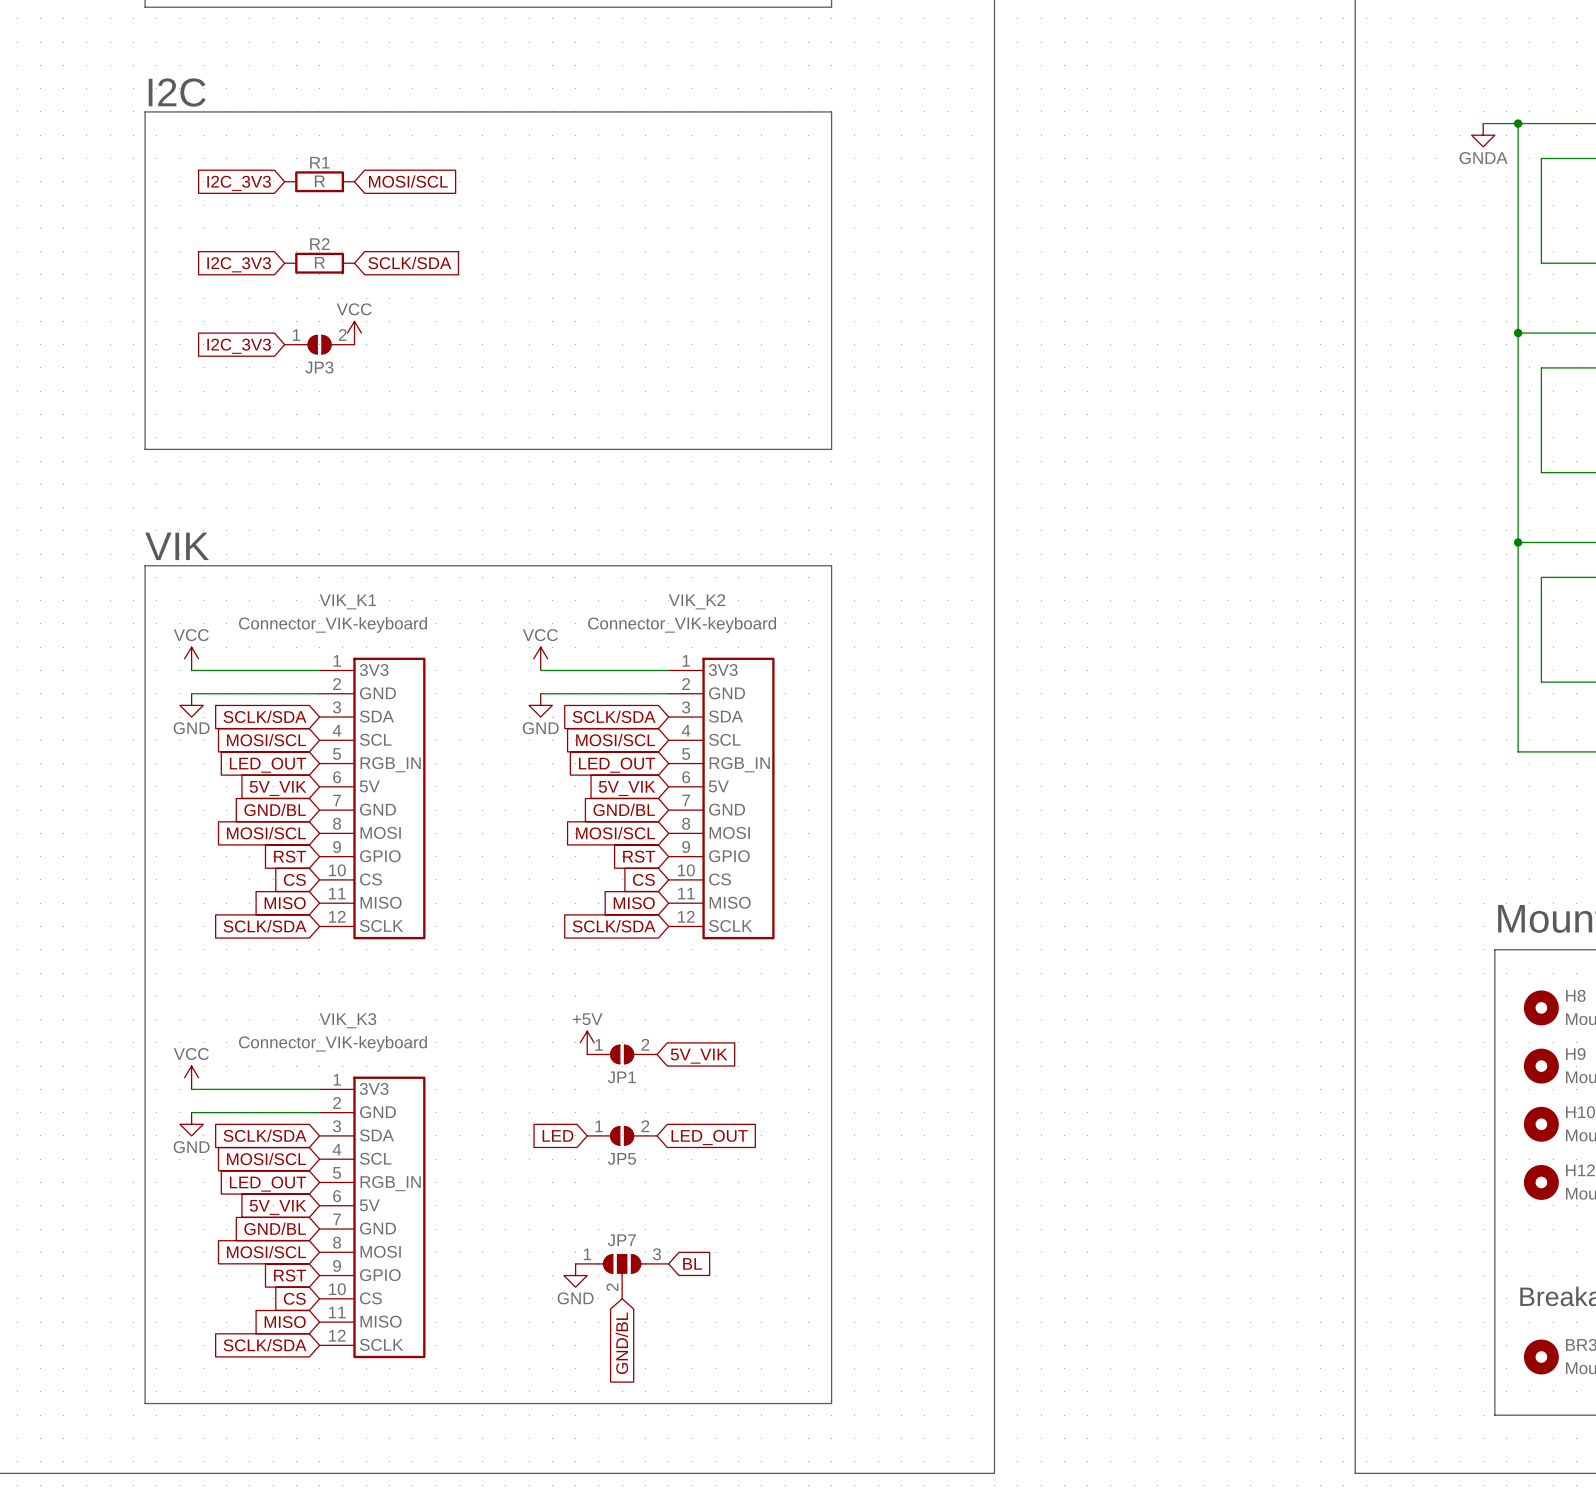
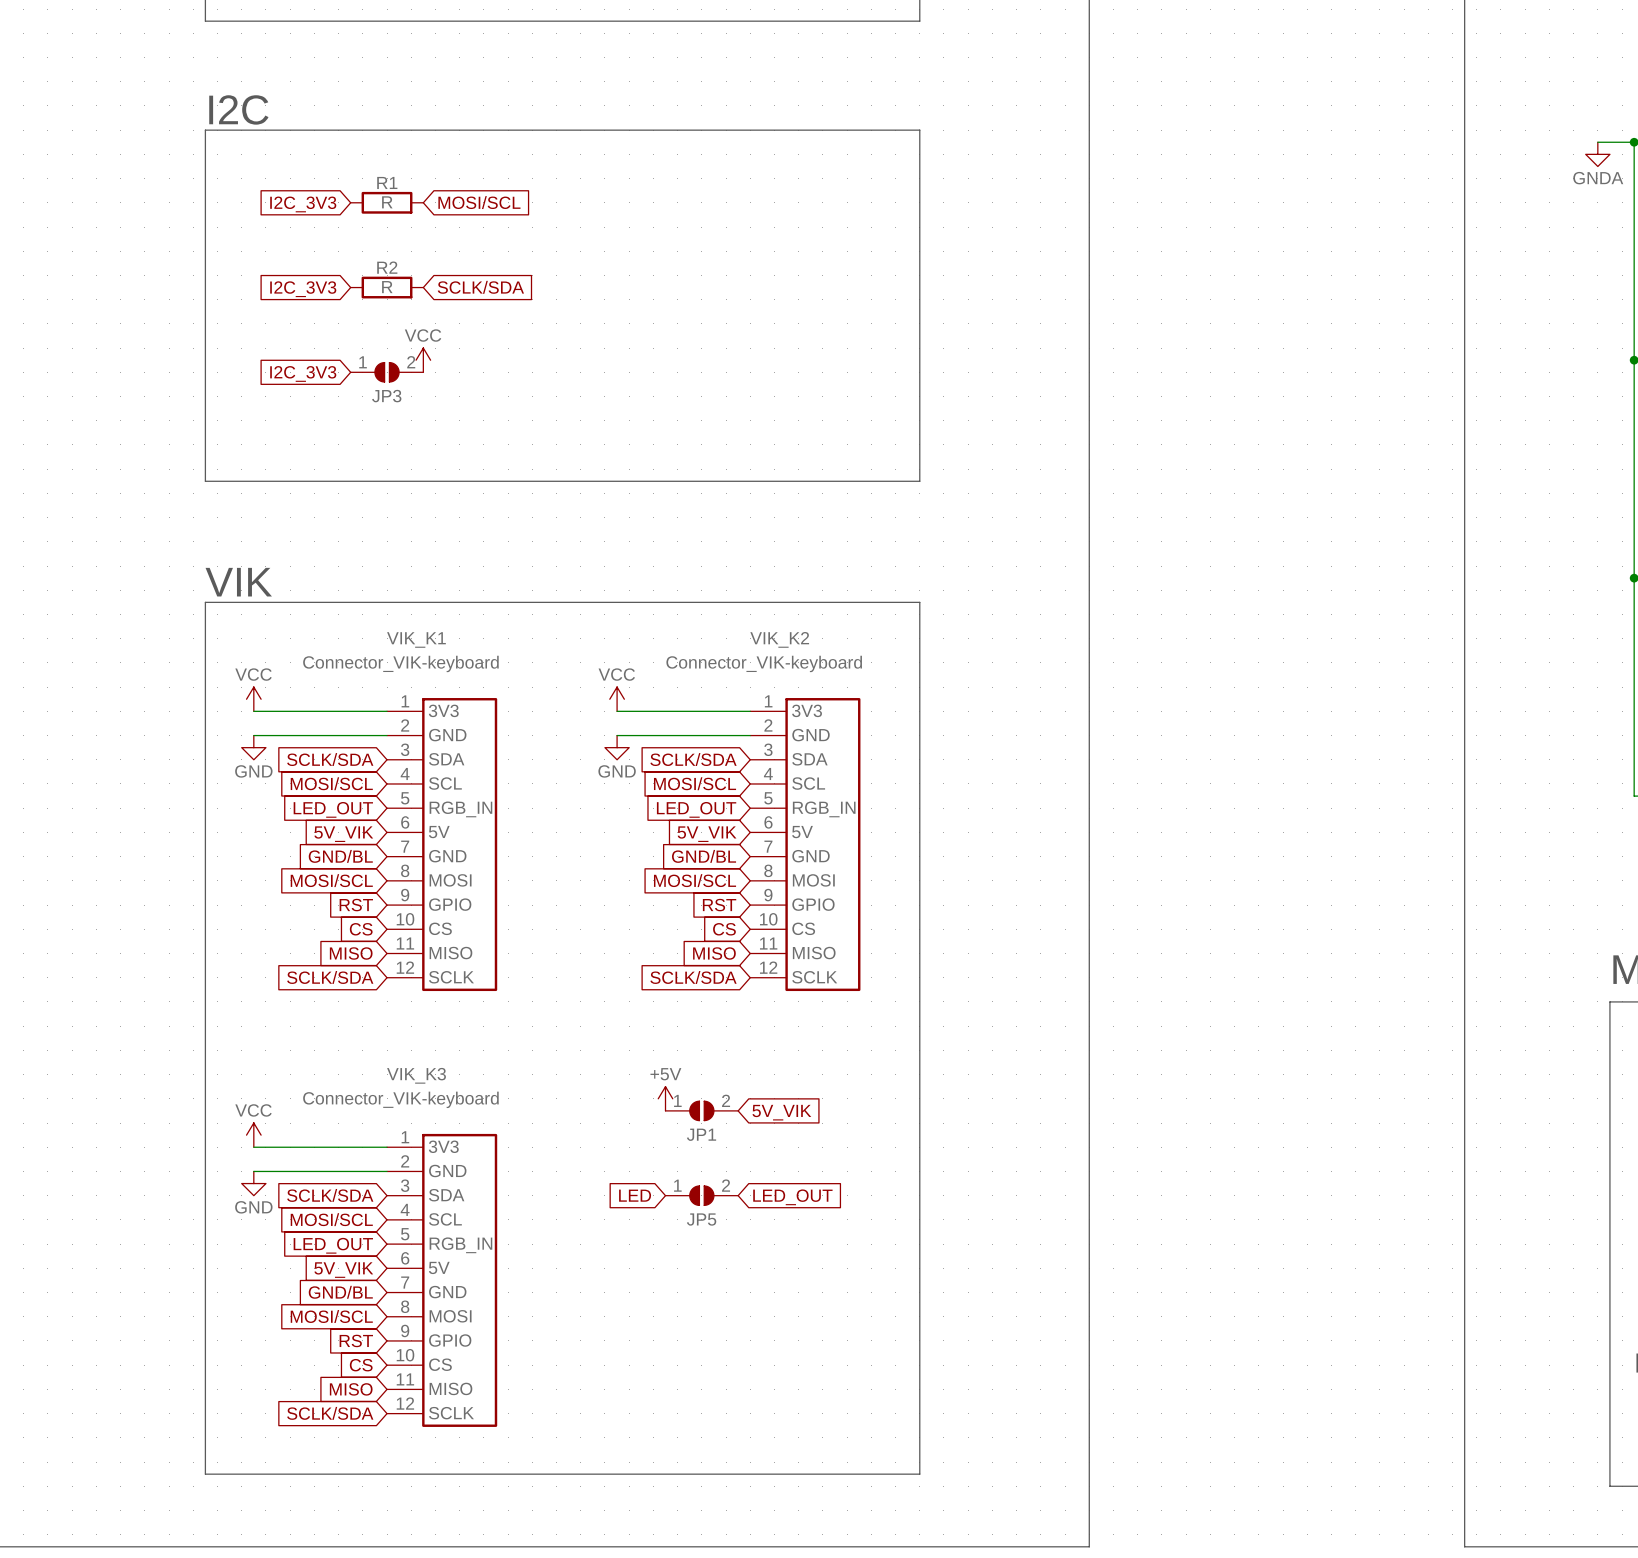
global label: BL (692, 1263) -> none
power symbol: GND (575, 1275) -> none
JP7: (622, 1276) -> none
global label: GND/BL (621, 1343) -> none

